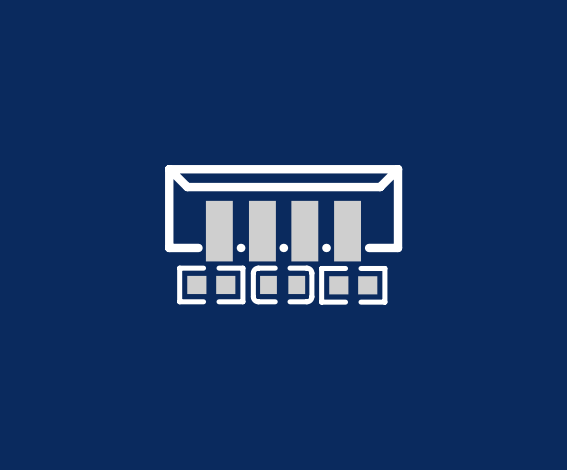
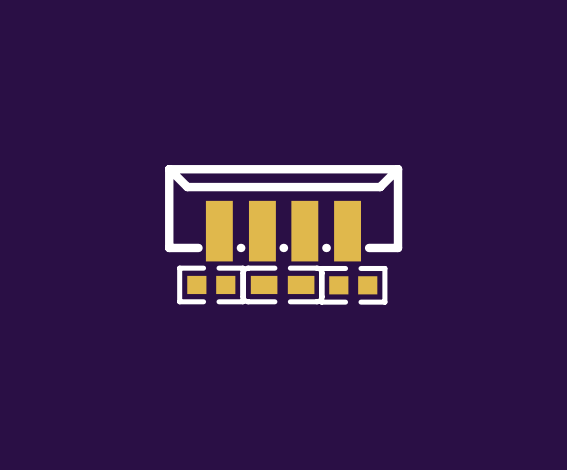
part footprint: [250, 265, 315, 305] -> [240, 265, 325, 305]

